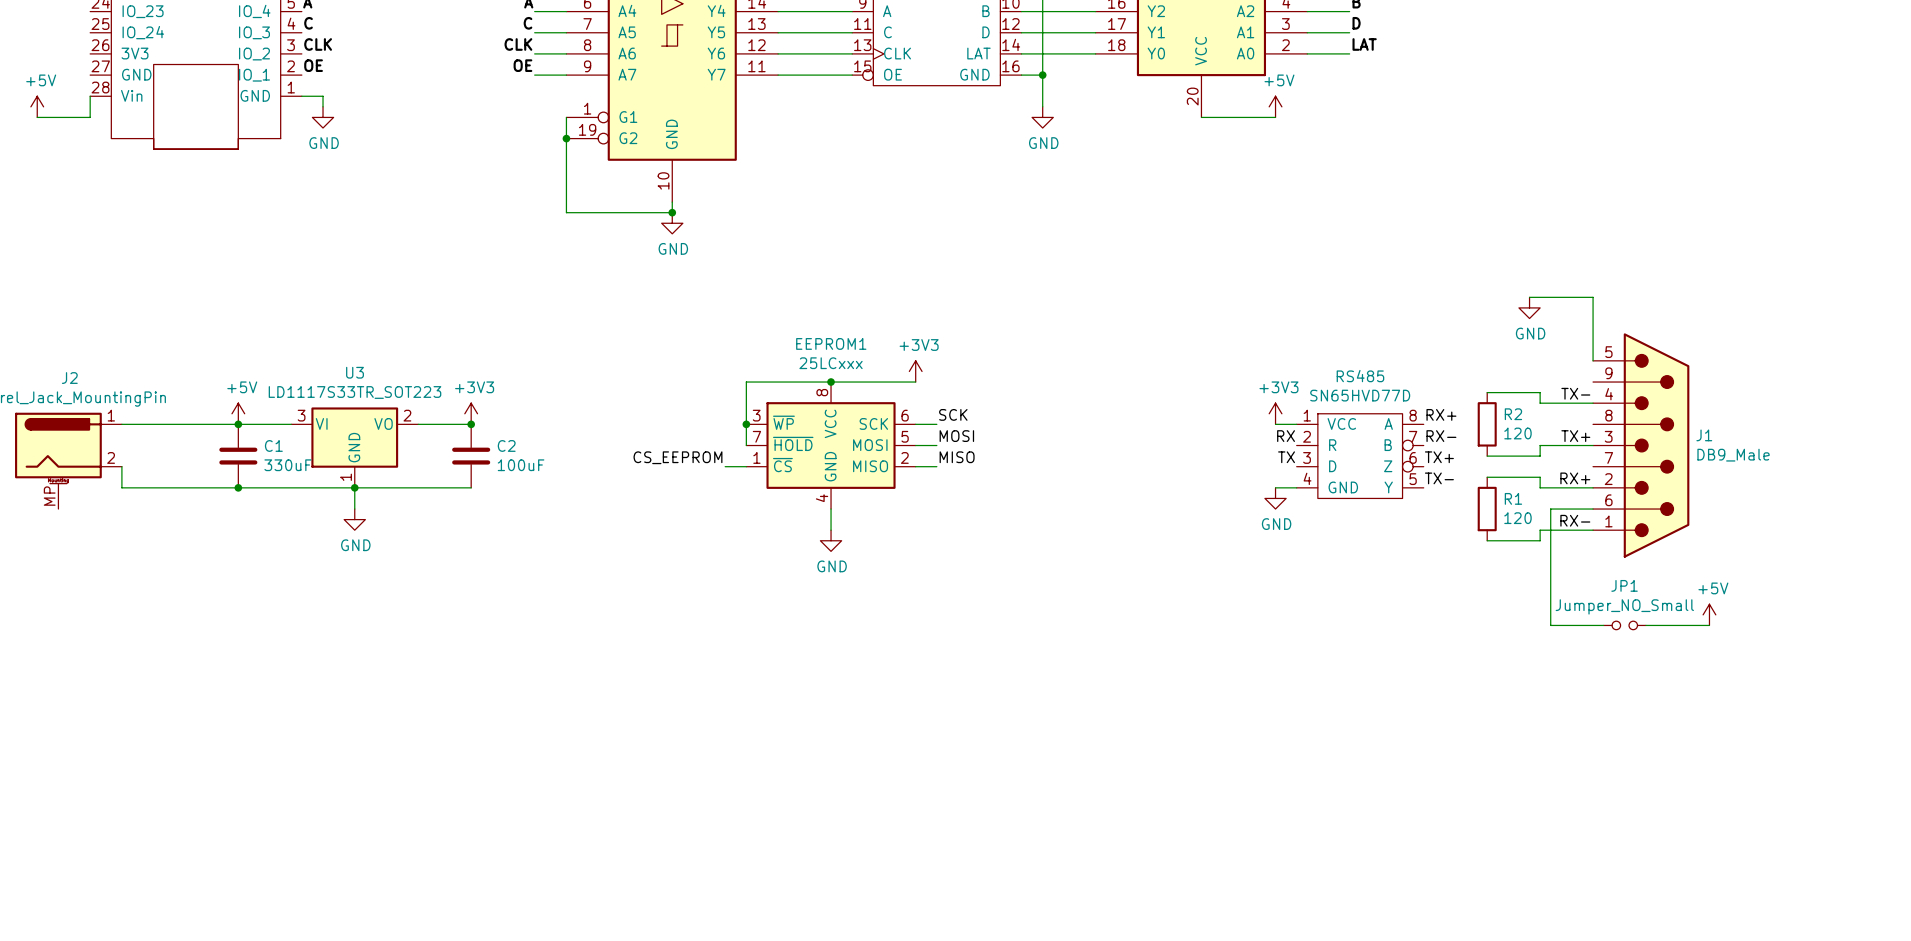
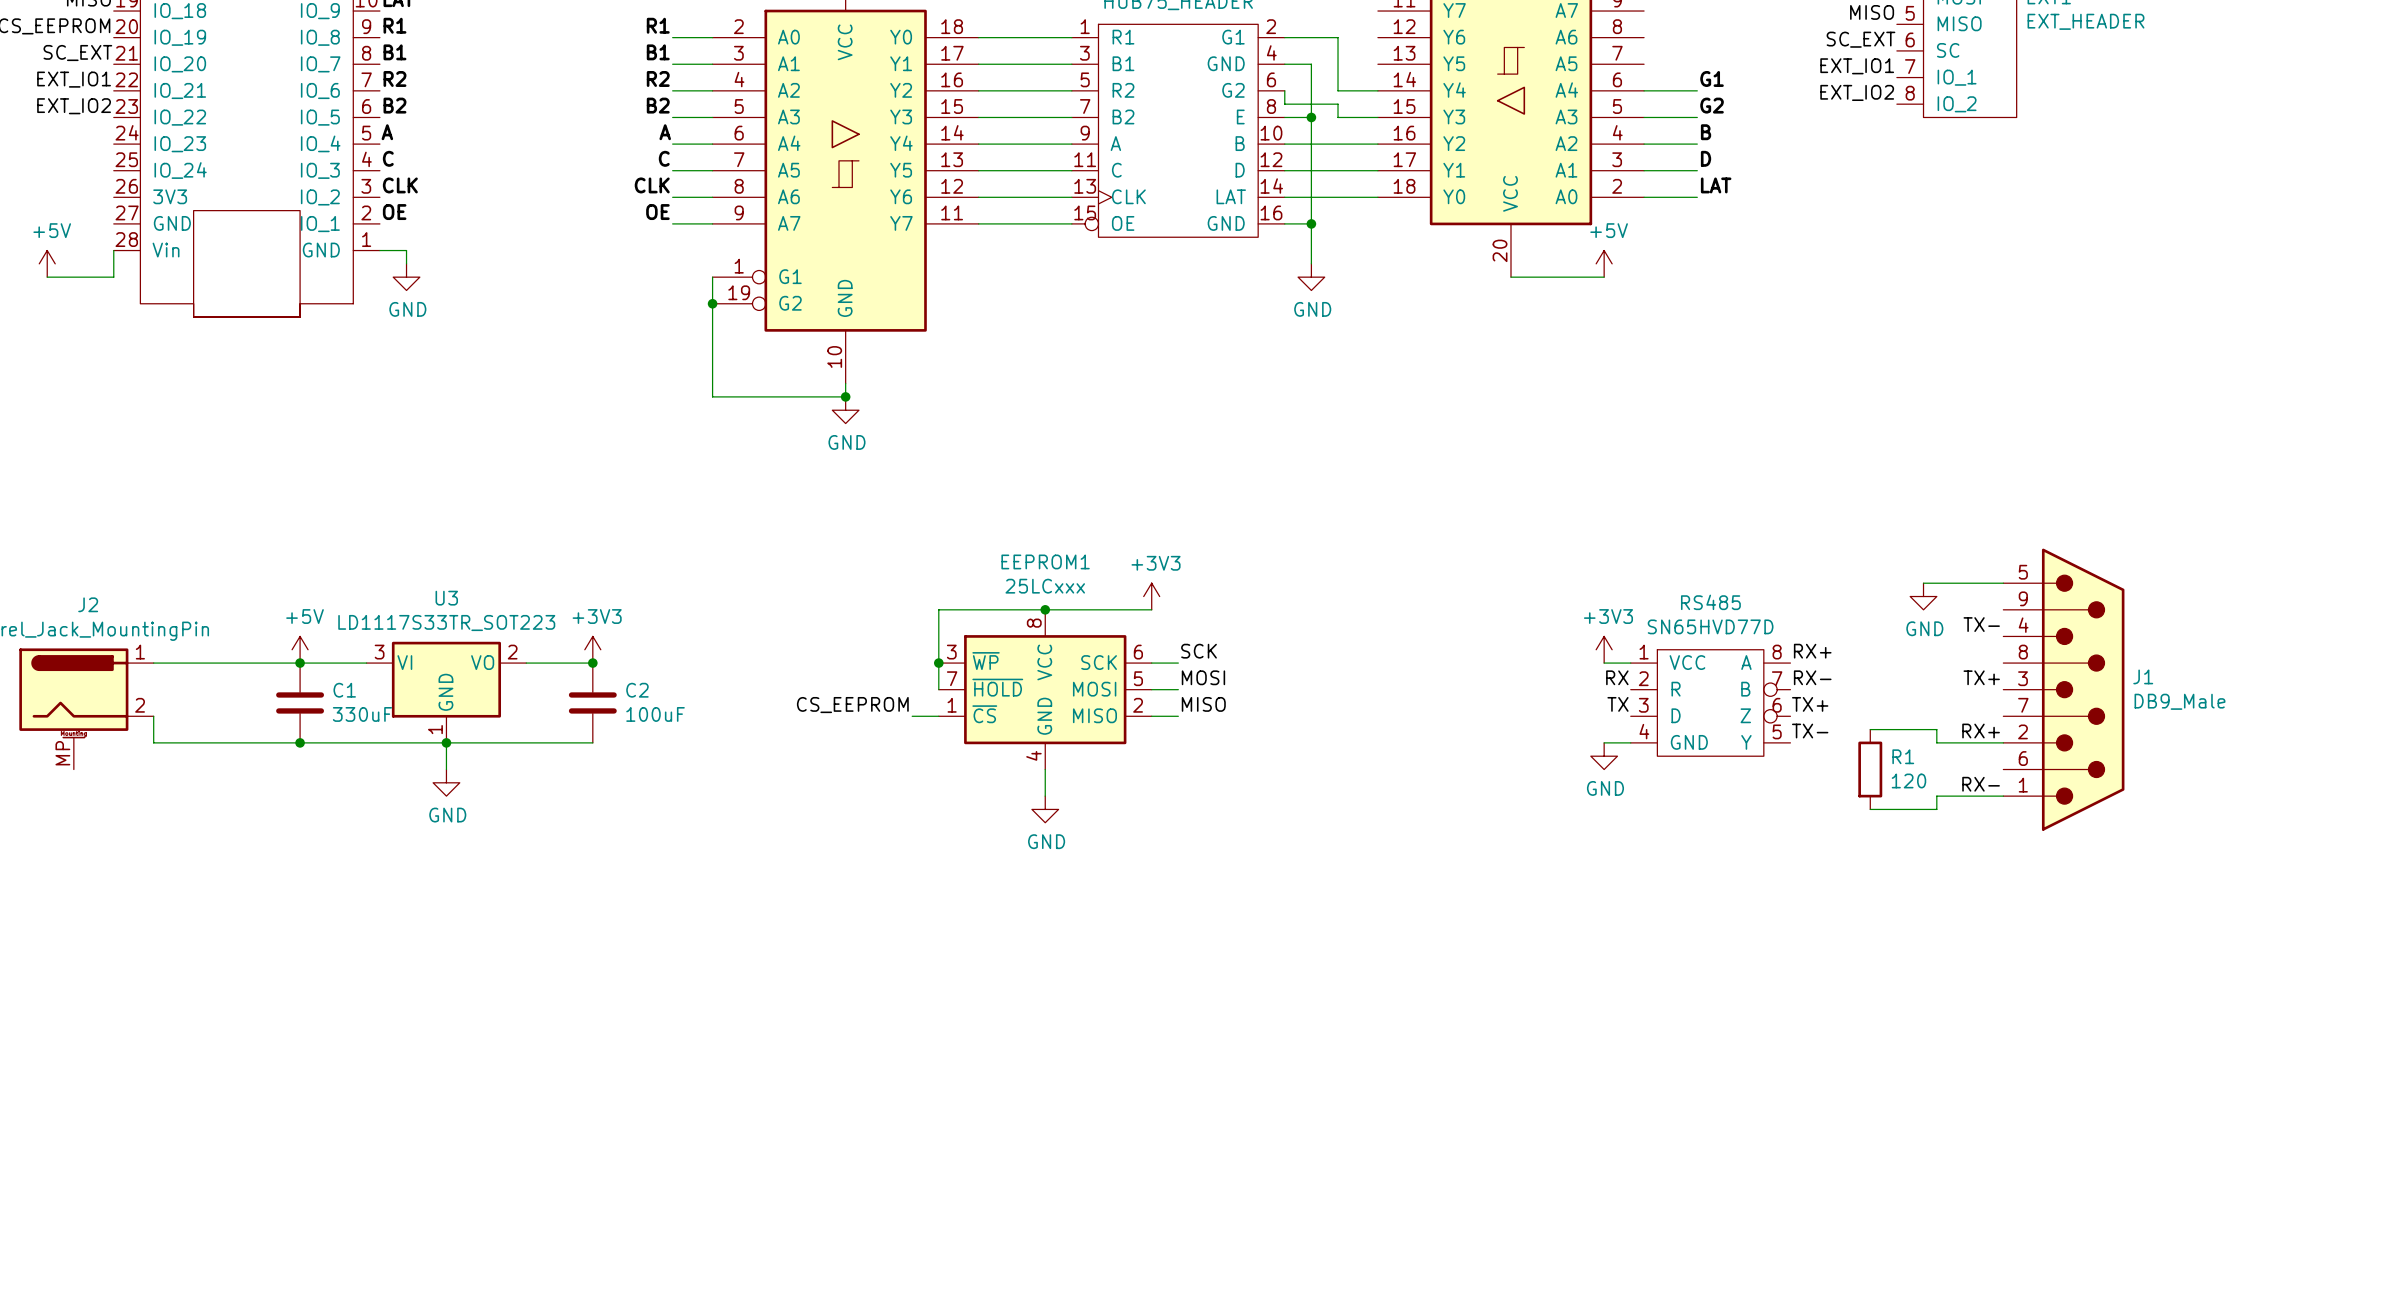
wire: (1529, 297) (1593, 297) (1593, 360) -> (1923, 583) (2003, 583)
power symbol position: GND (1529, 307) -> GND (1923, 596)
wire: (1487, 392) (1540, 392) (1540, 403) (1593, 403) -> none
R2: 120 (1487, 424) -> none
wire: (1593, 445) (1540, 445) (1540, 456) (1487, 456) -> none
wire: (1593, 509) (1550, 509) (1550, 625) (1603, 625) -> none
power symbol: +5V (1709, 614) -> none
JP1: Jumper_NO_Small (1624, 625) -> none
wire: (1645, 625) (1709, 625) -> none

